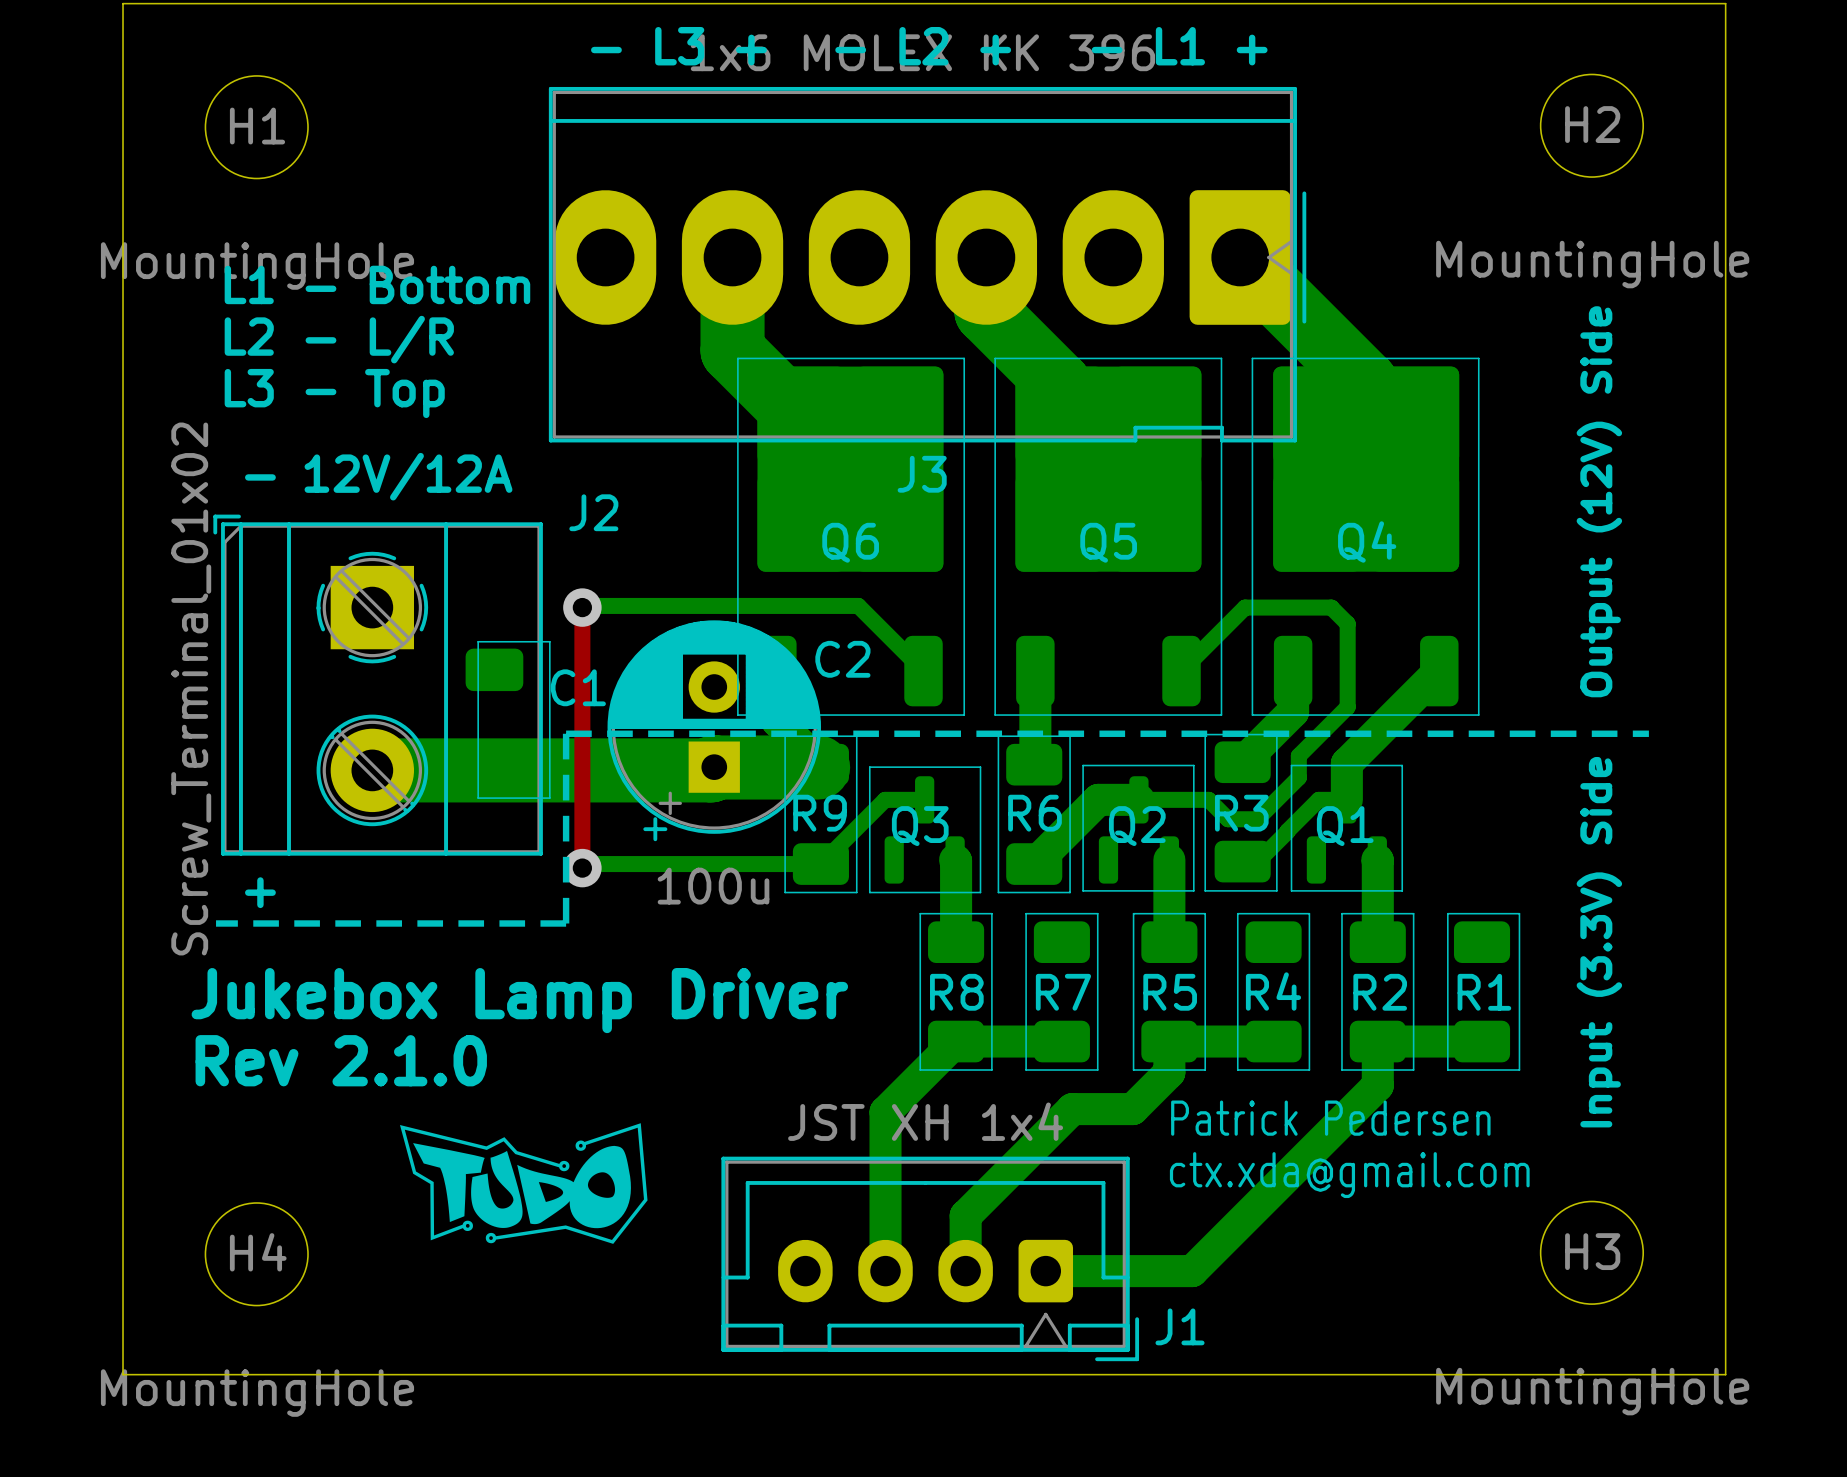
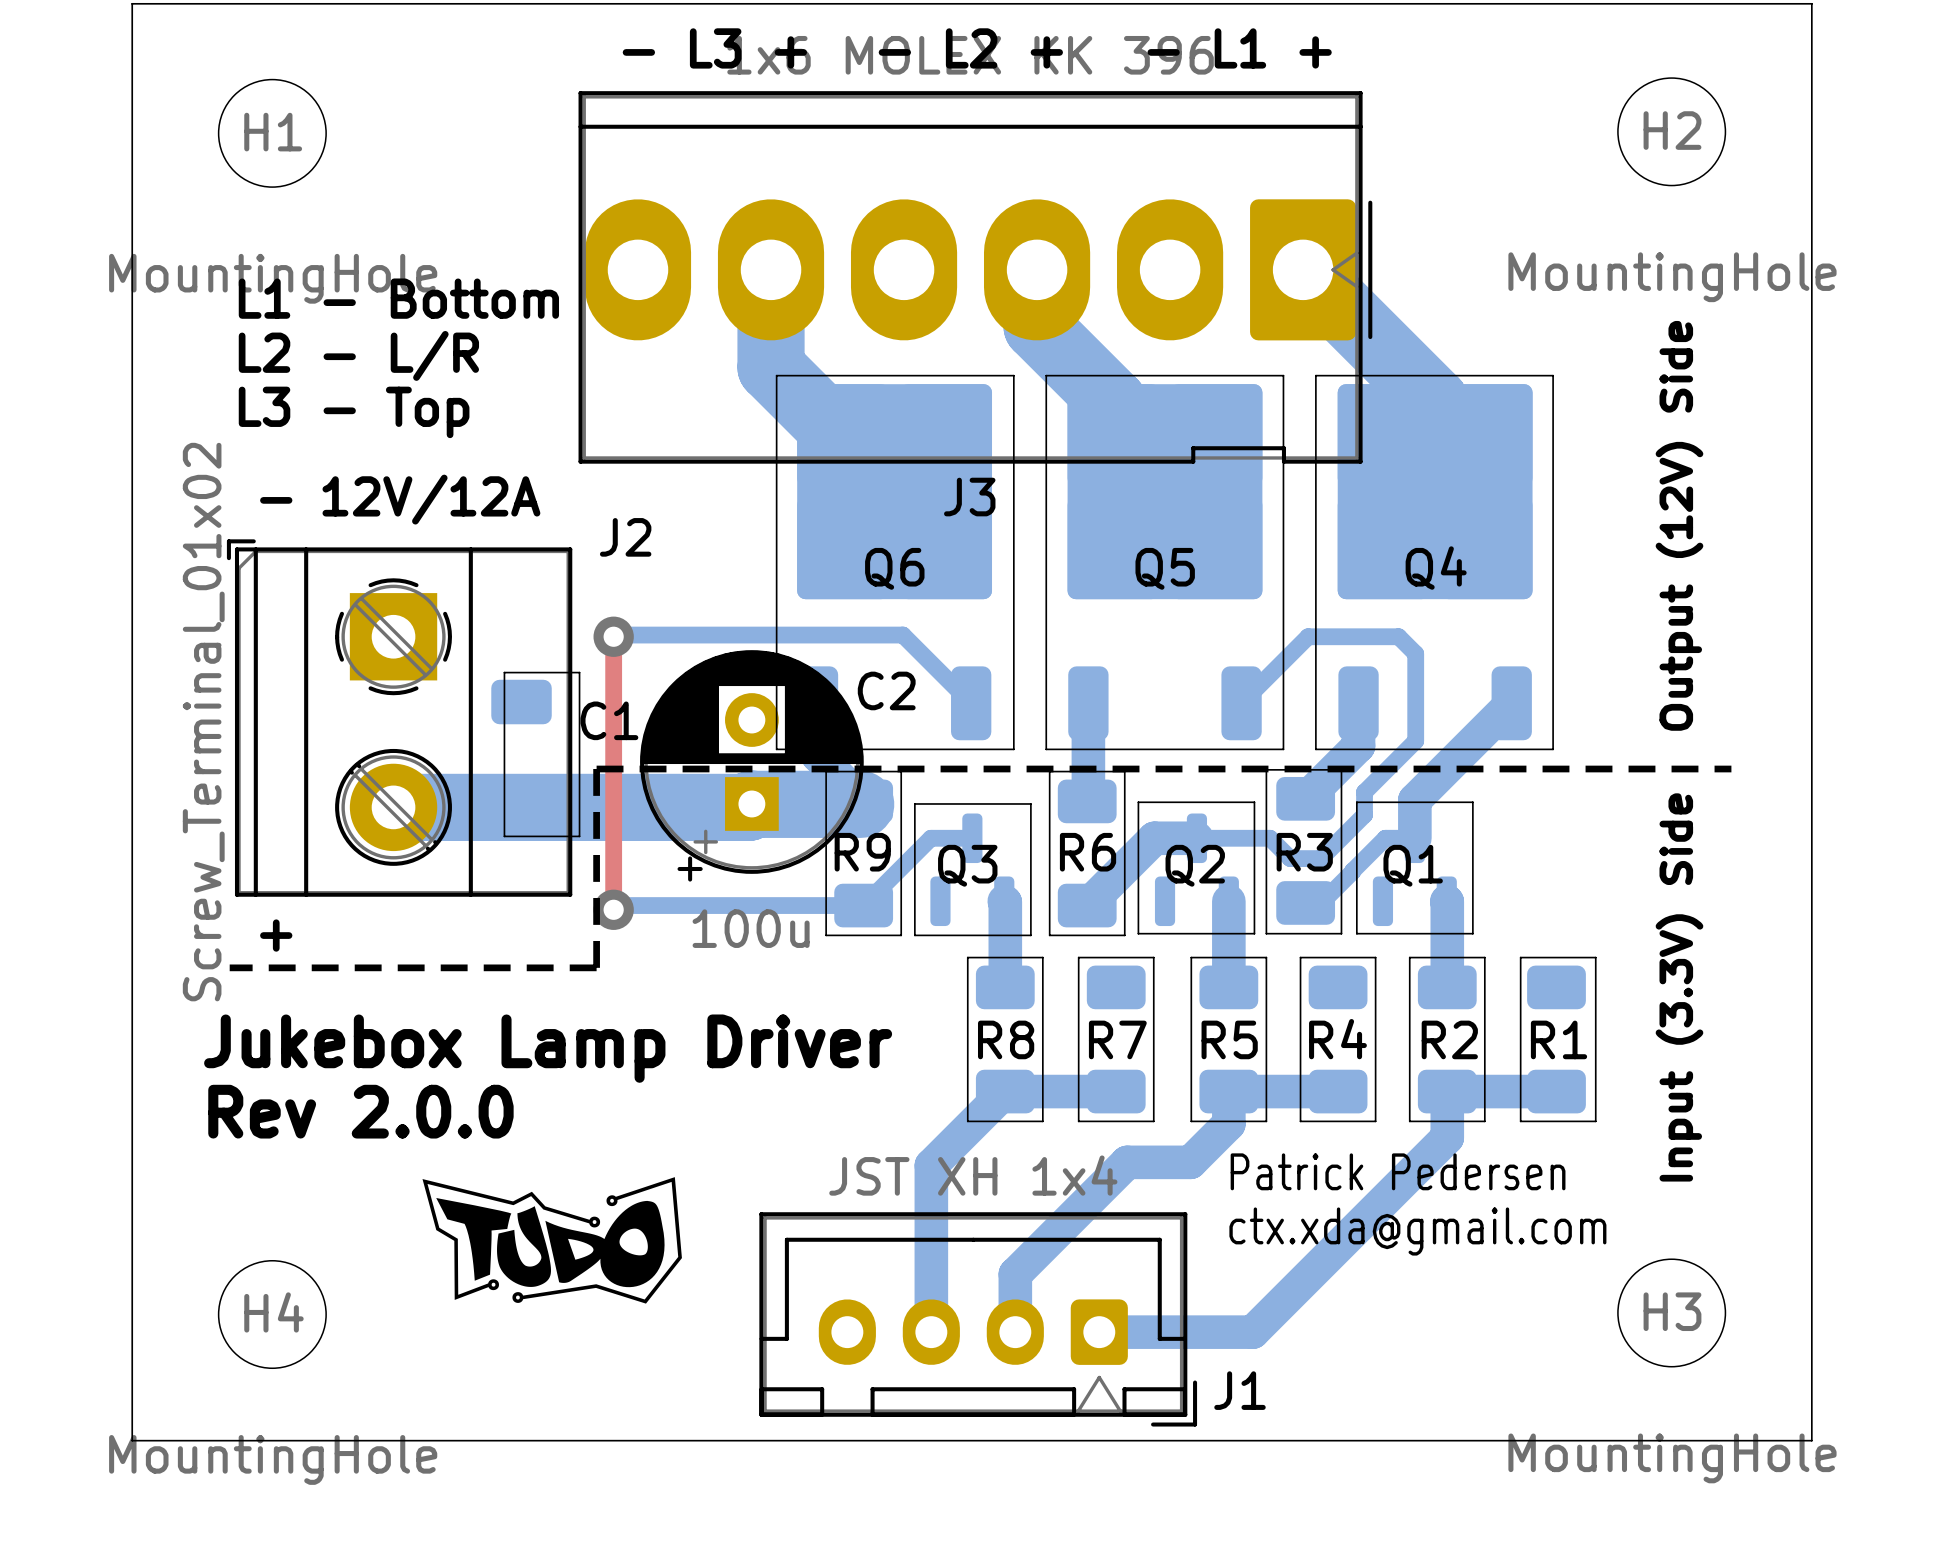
text: Rev 2.1.0 (341, 1060) -> Rev 2.0.0 (360, 1111)

